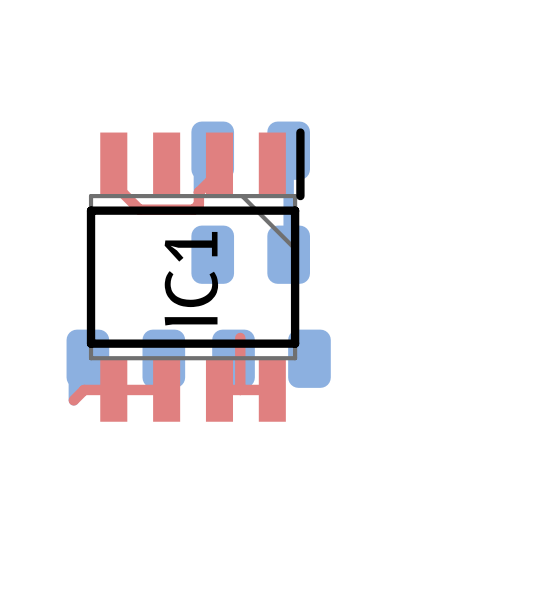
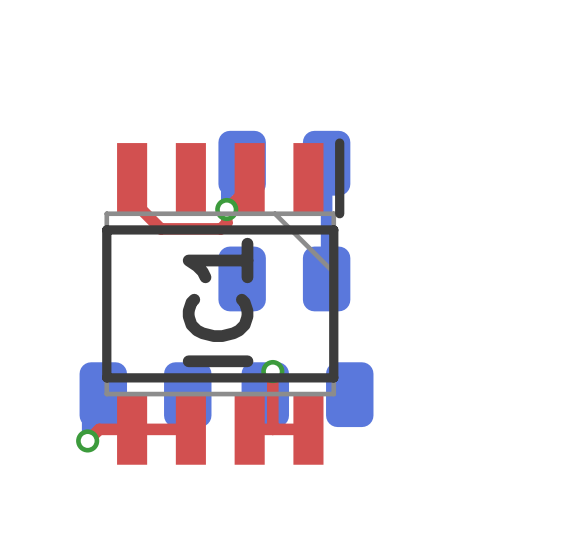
via: none -> (226, 209)
via: none -> (272, 371)
via: none -> (87, 440)

